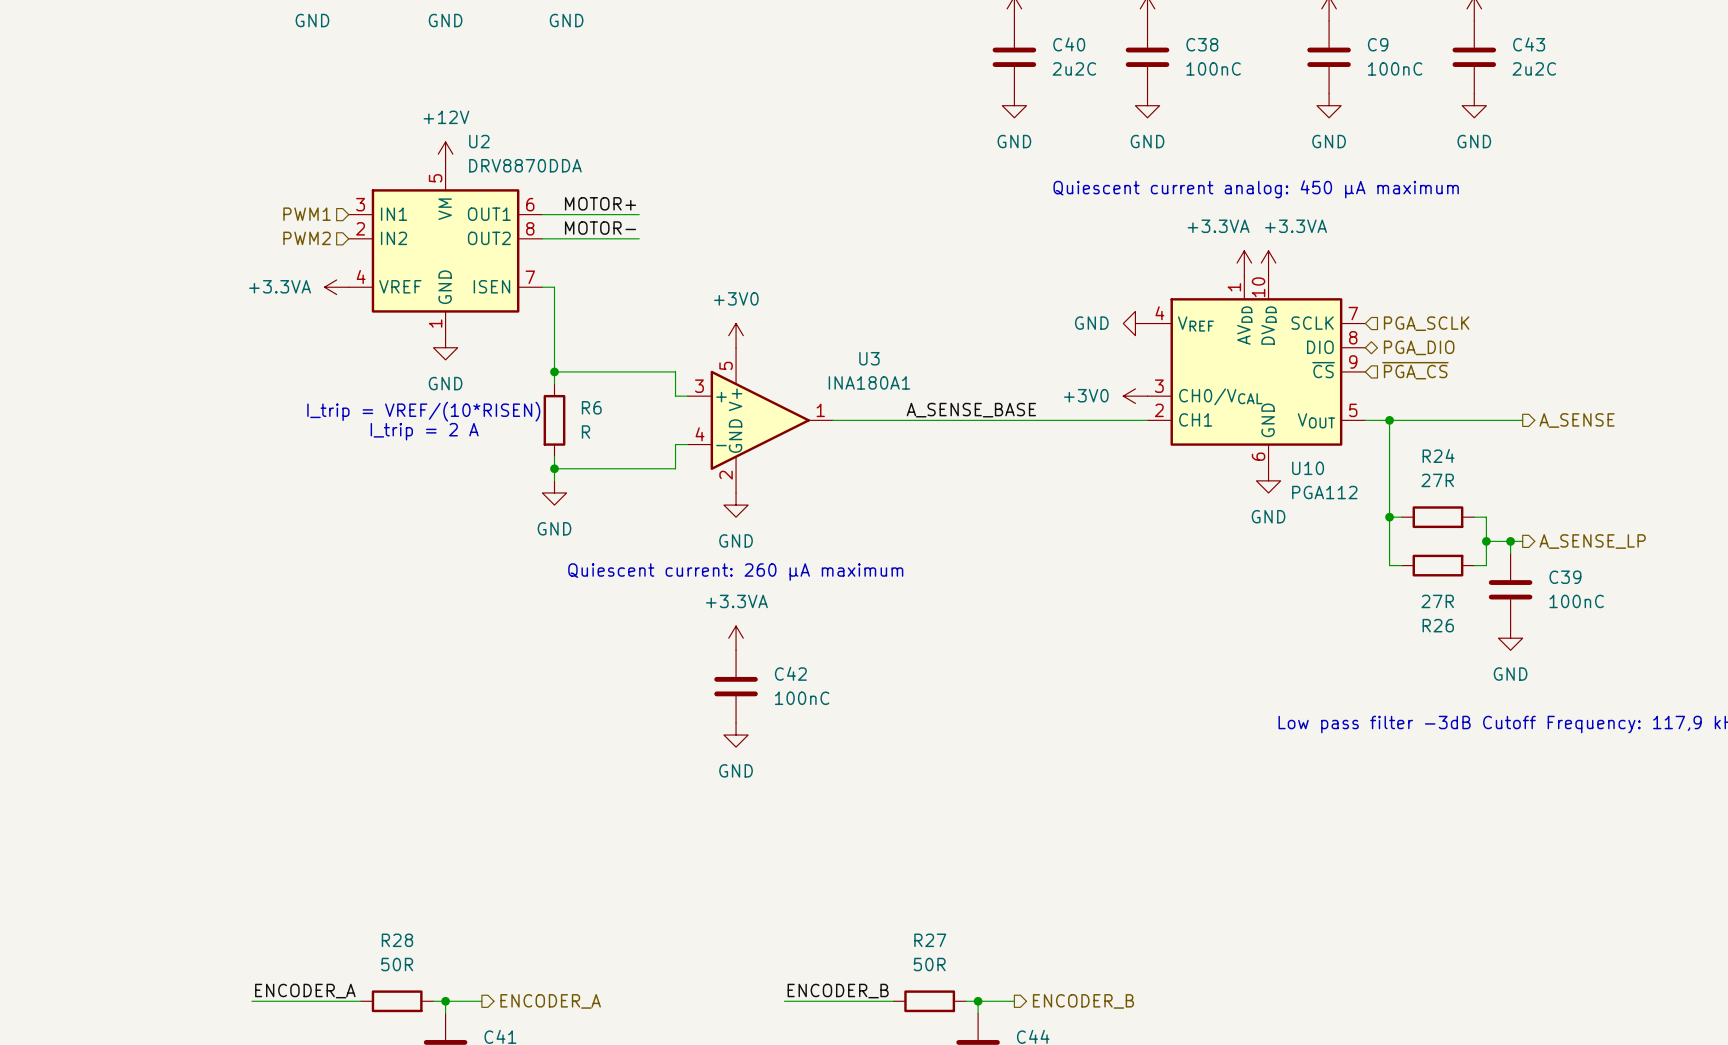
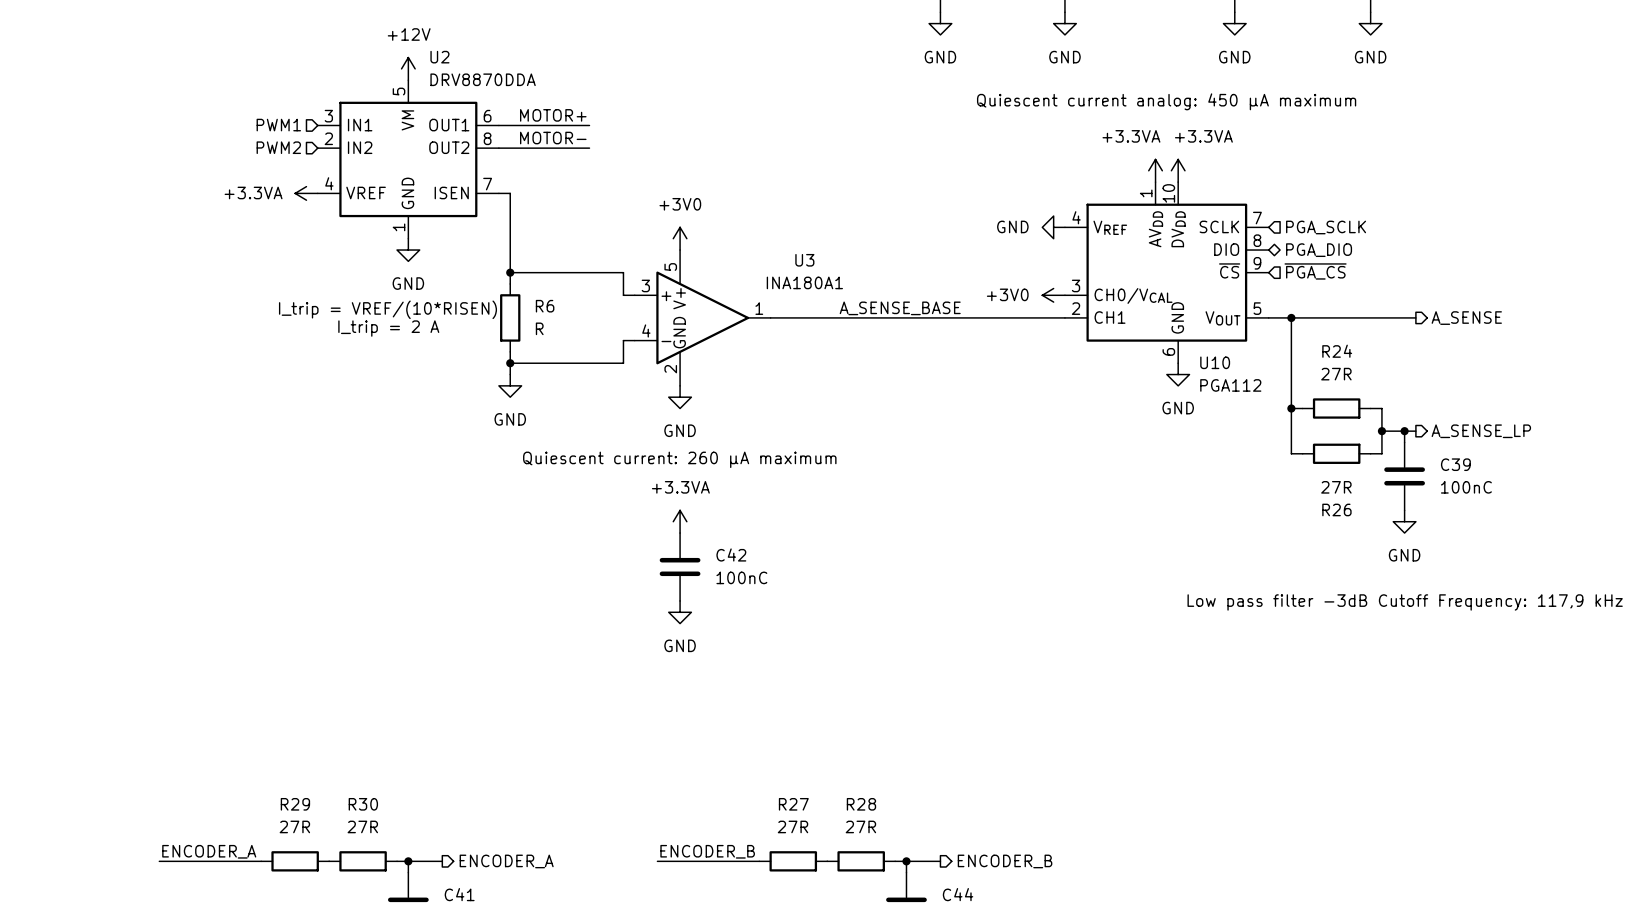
R28 name: R28 (397, 940) -> R30 (363, 804)
R27 name: R27 (930, 940) -> R28 (861, 804)
R28 value: 50R (397, 964) -> 27R (362, 826)
R27 value: 50R (929, 964) -> 27R (860, 826)
label position: ENCODER_A (305, 991) -> ENCODER_A (209, 851)
label position: ENCODER_B (838, 991) -> ENCODER_B (707, 851)
wire: (288, 1001) (360, 1001) -> (159, 861) (227, 861)
R29: none -> 27R (295, 861)
wire: (820, 1001) (893, 1001) -> (657, 861) (725, 861)
R27: none -> 27R (793, 861)

